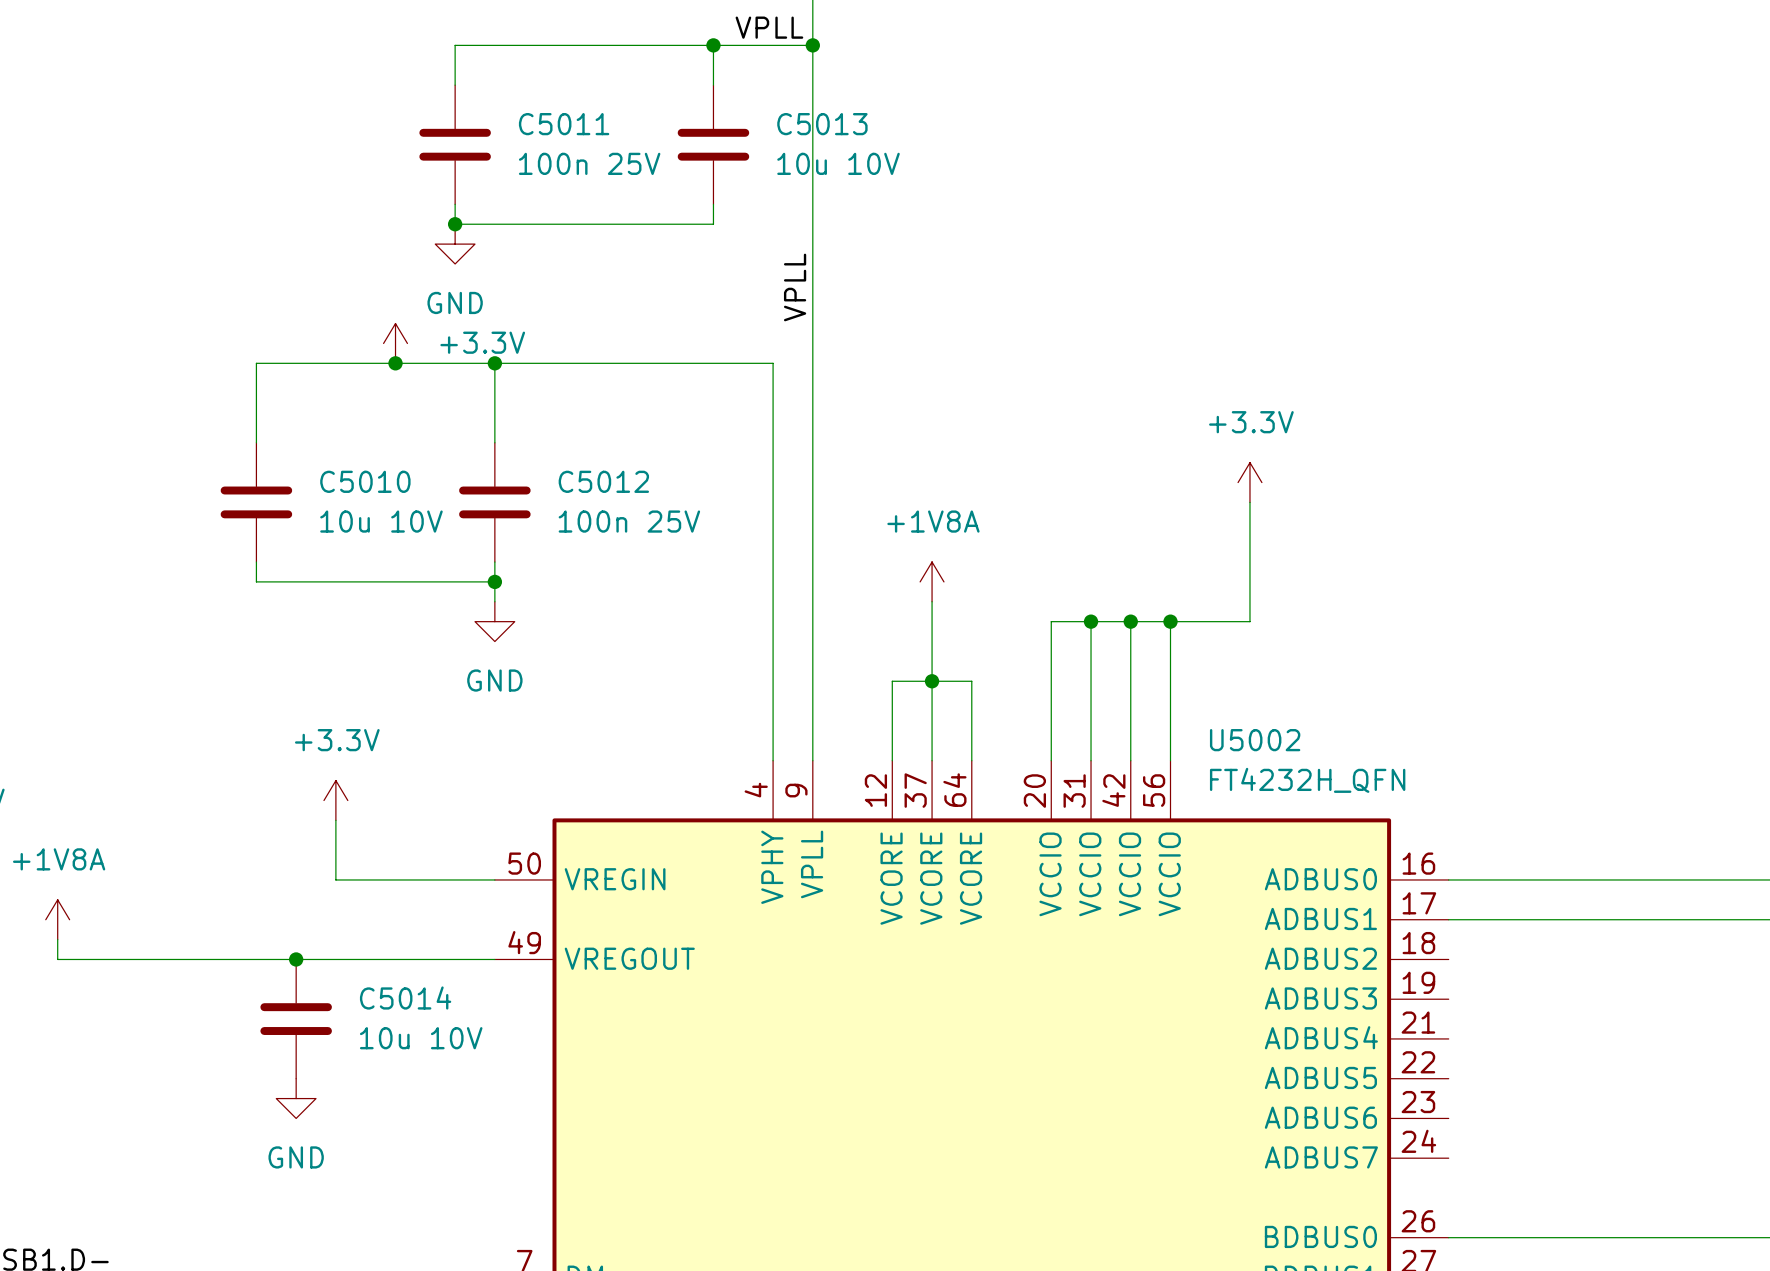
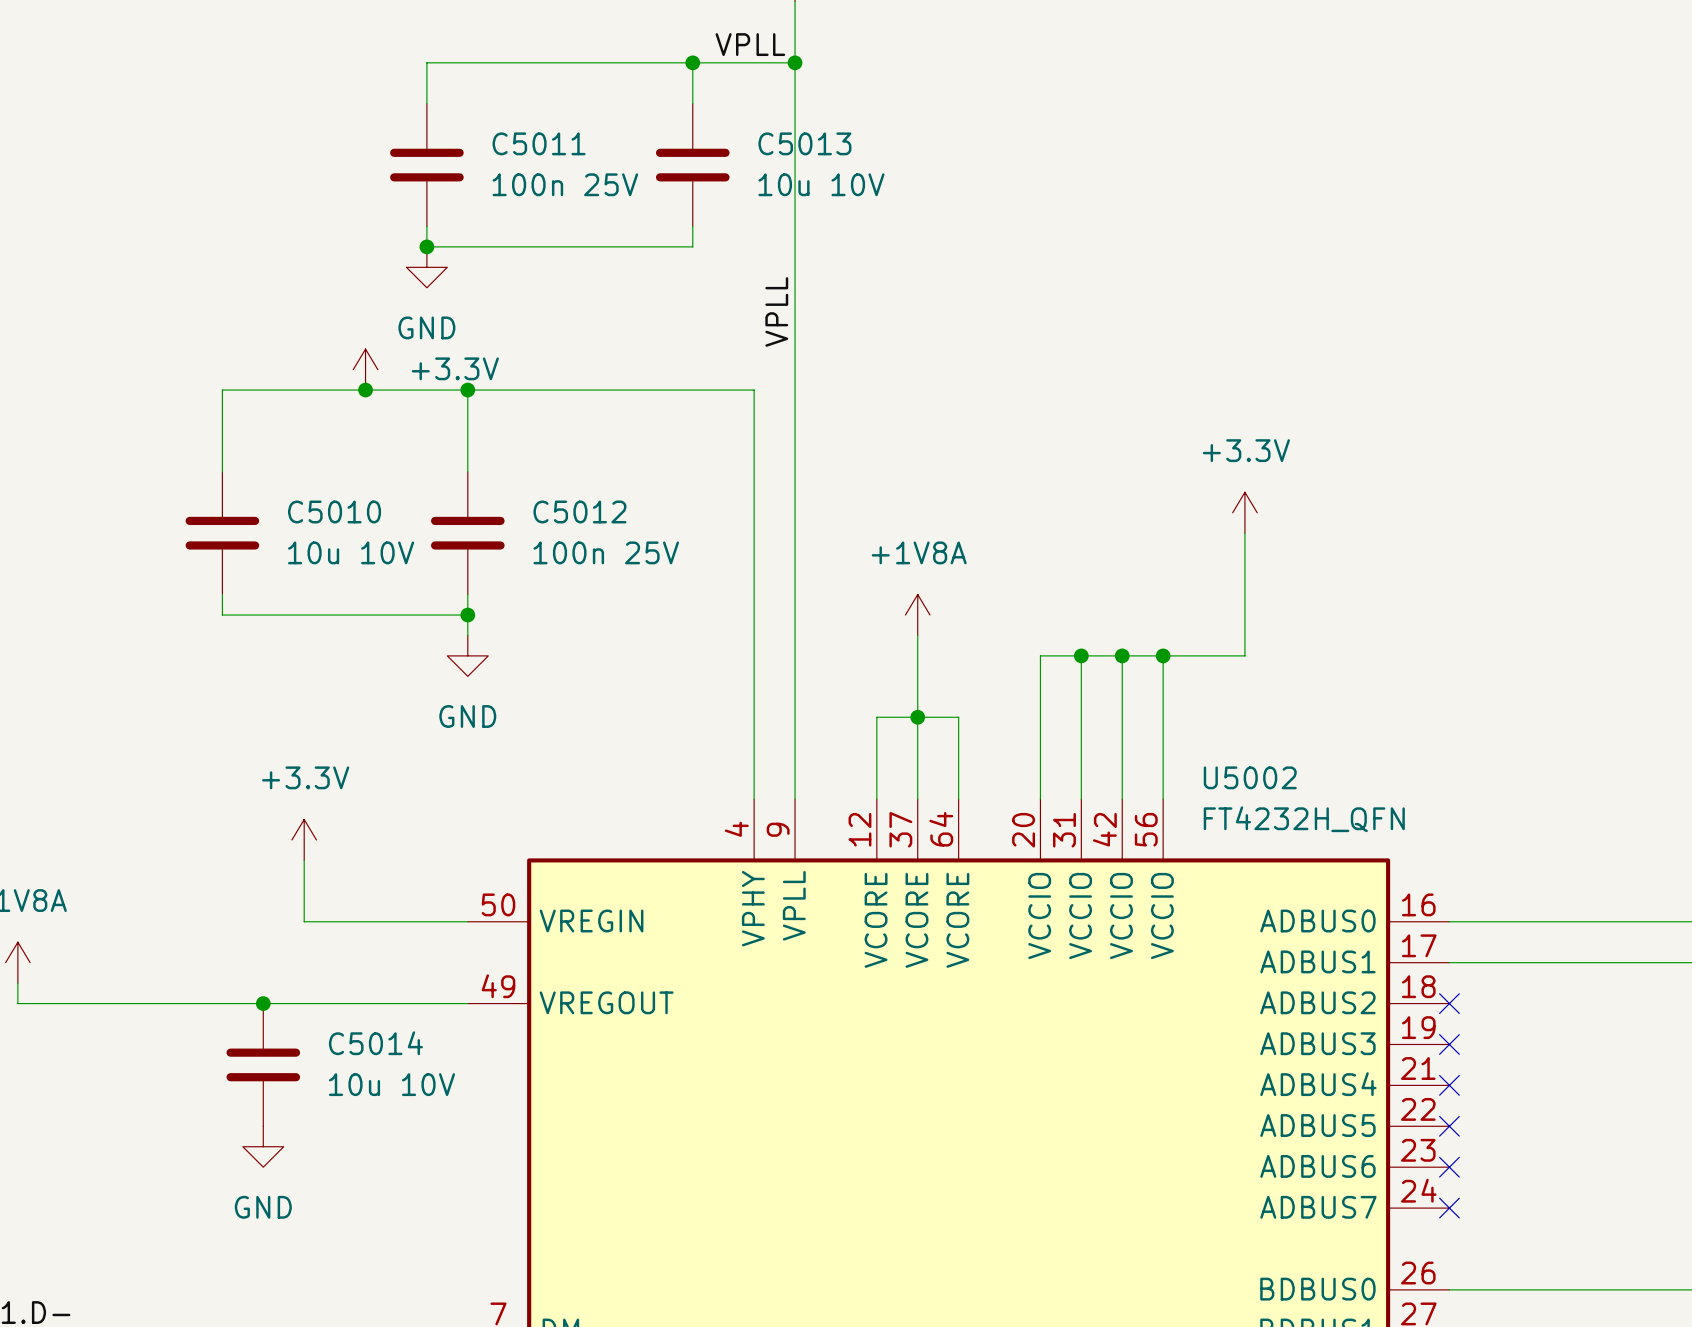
no-connect mark: none -> (1449, 1003)
no-connect mark: none -> (1449, 1044)
no-connect mark: none -> (1449, 1085)
no-connect mark: none -> (1449, 1126)
no-connect mark: none -> (1449, 1167)
no-connect mark: none -> (1449, 1208)

